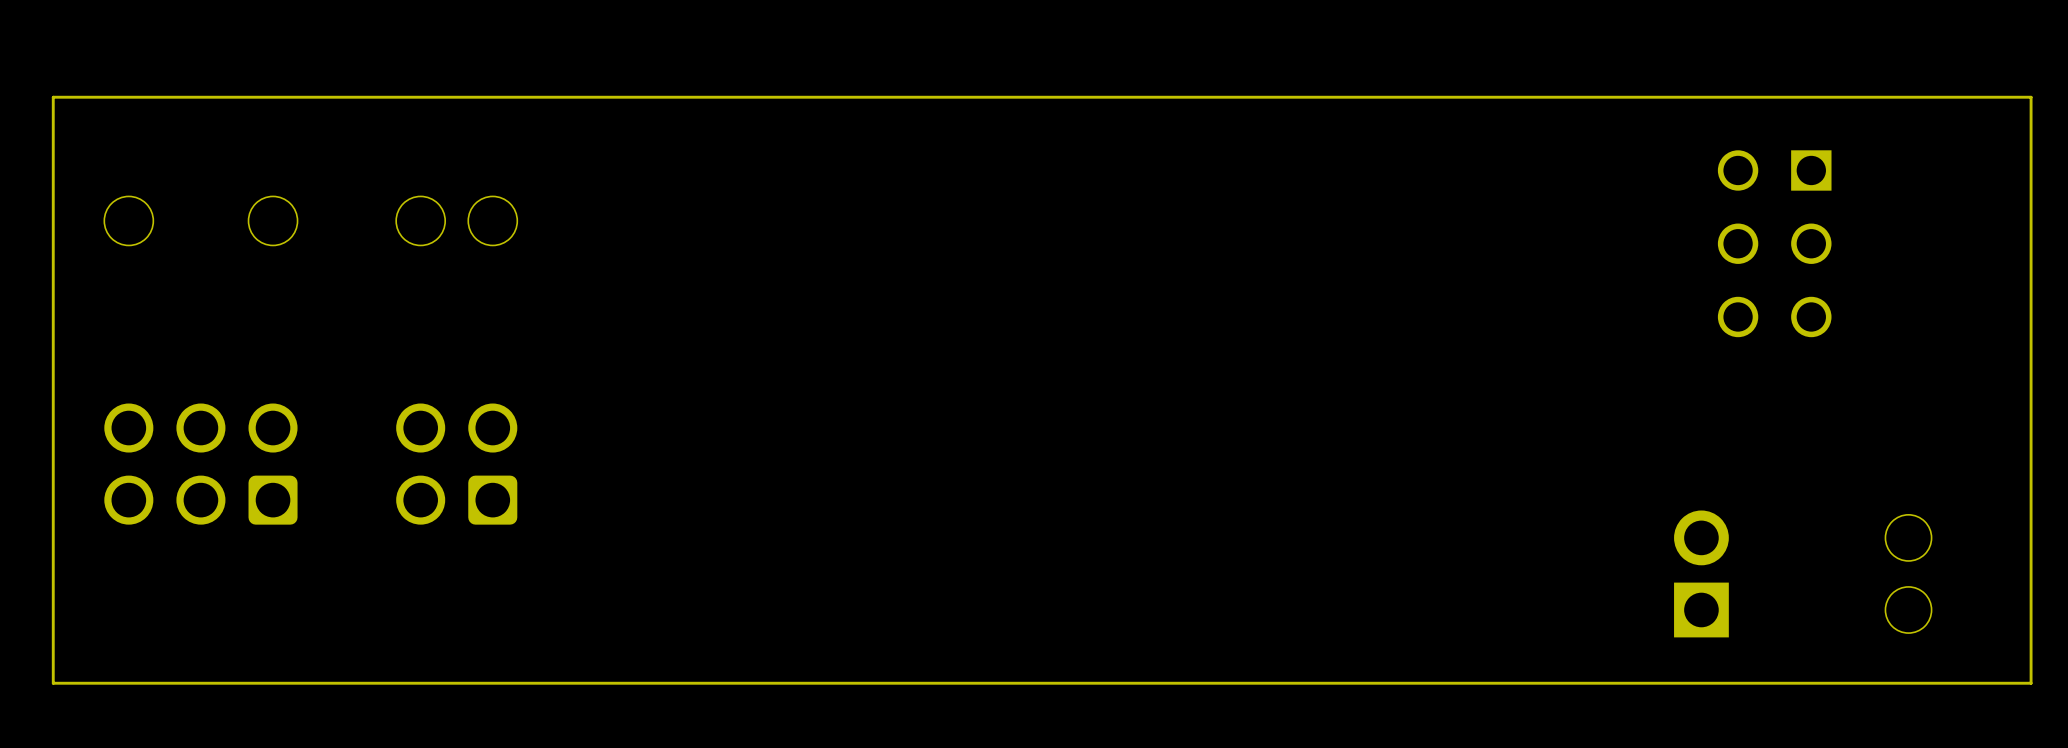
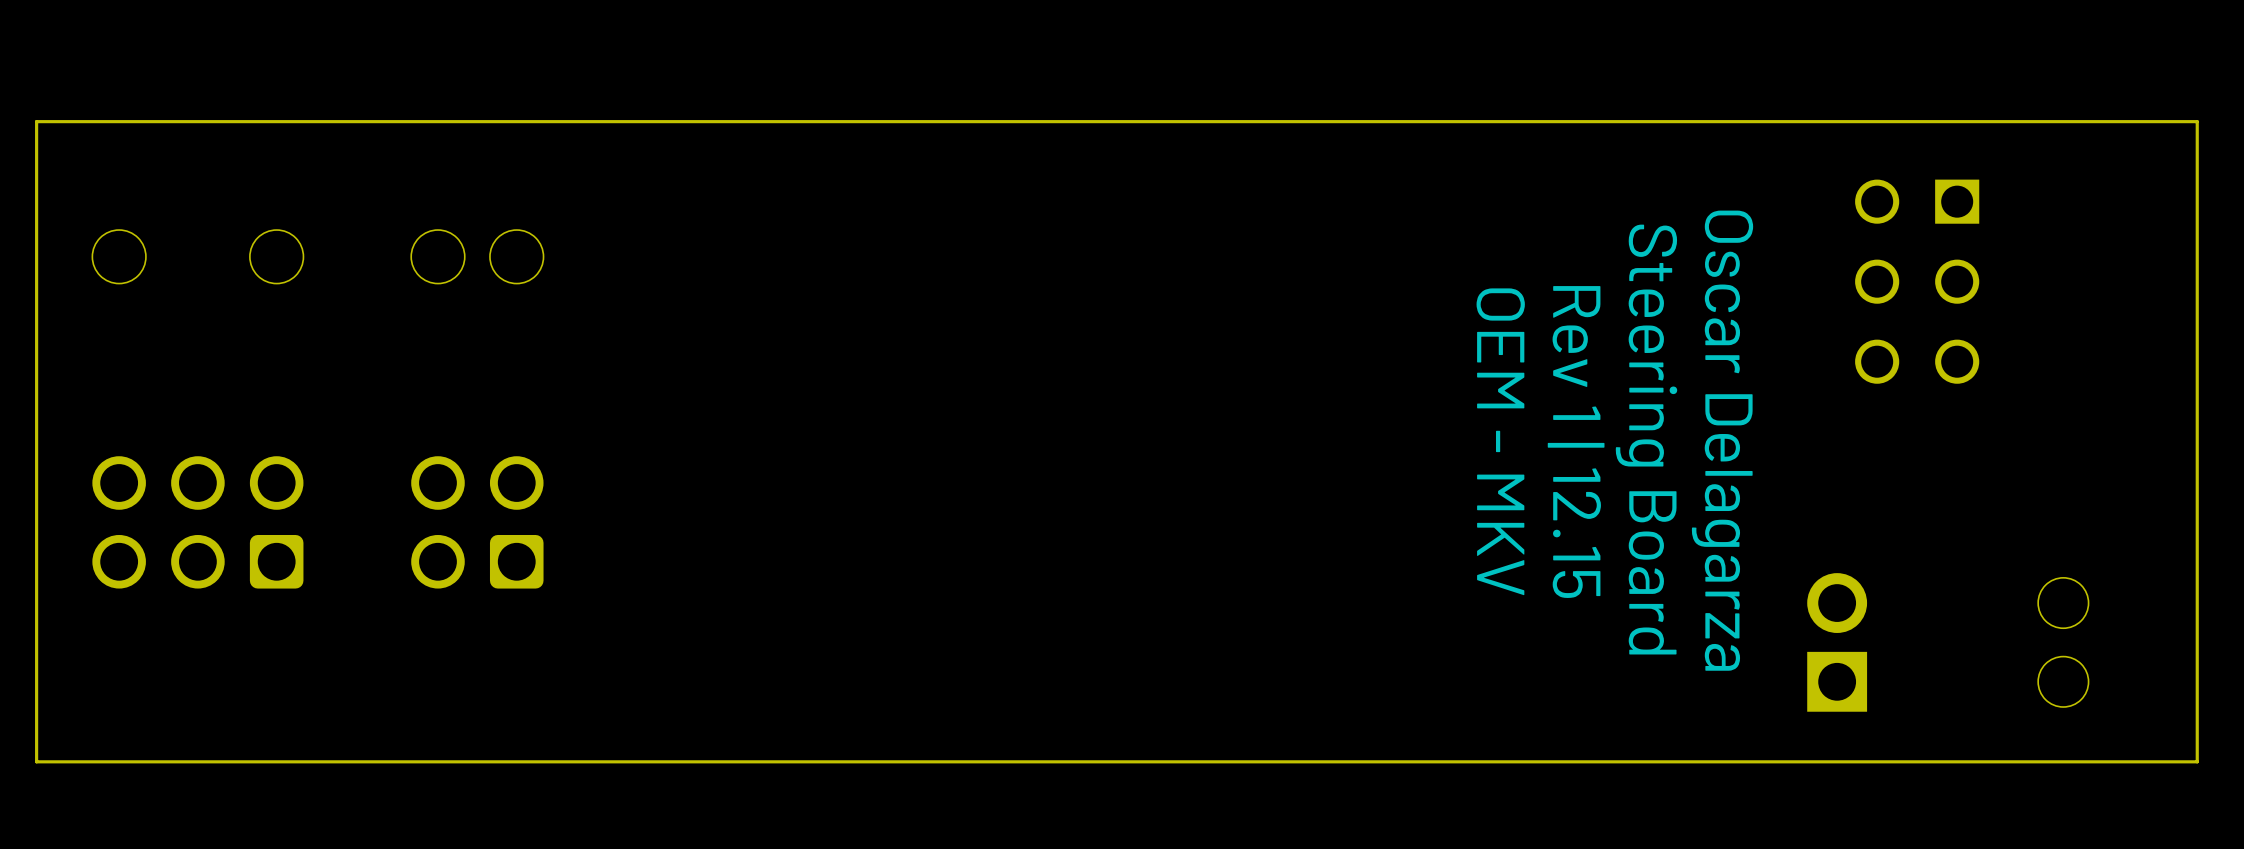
text: none -> Steering Board (1646, 439)
text: none -> Oscar Delagarza (1722, 440)
text: none -> OEM - MKV (1500, 441)
text: none -> Rev 1 | 12.15 (1576, 442)

